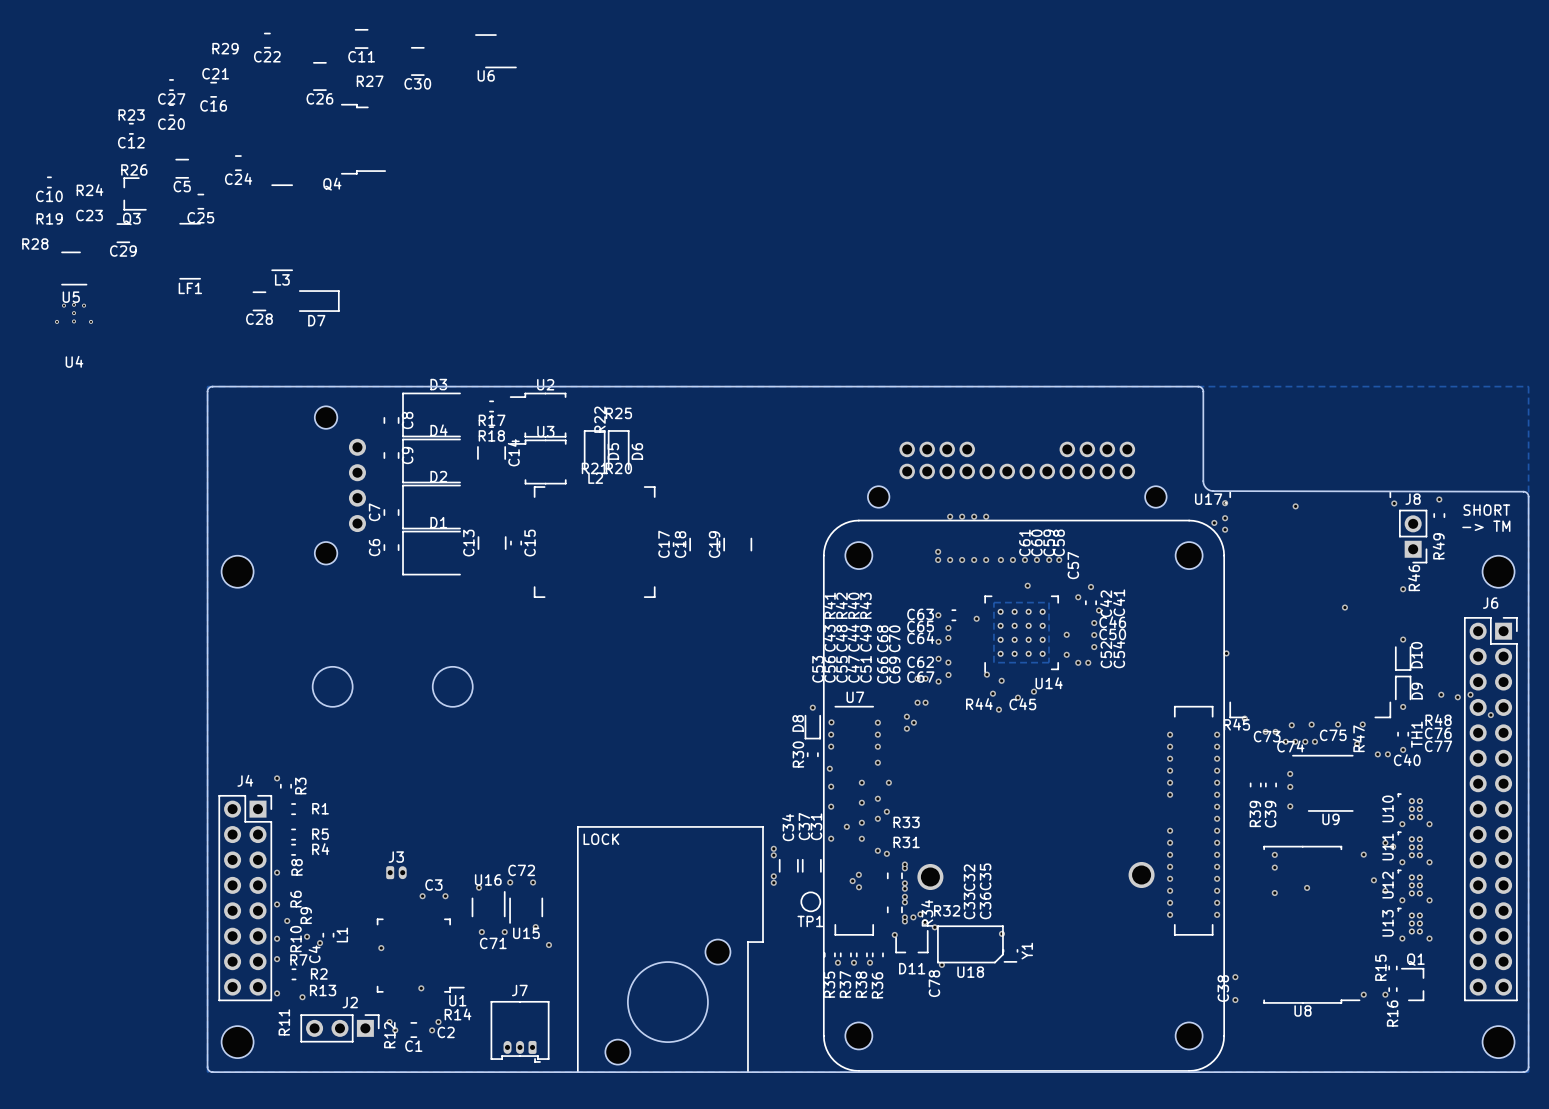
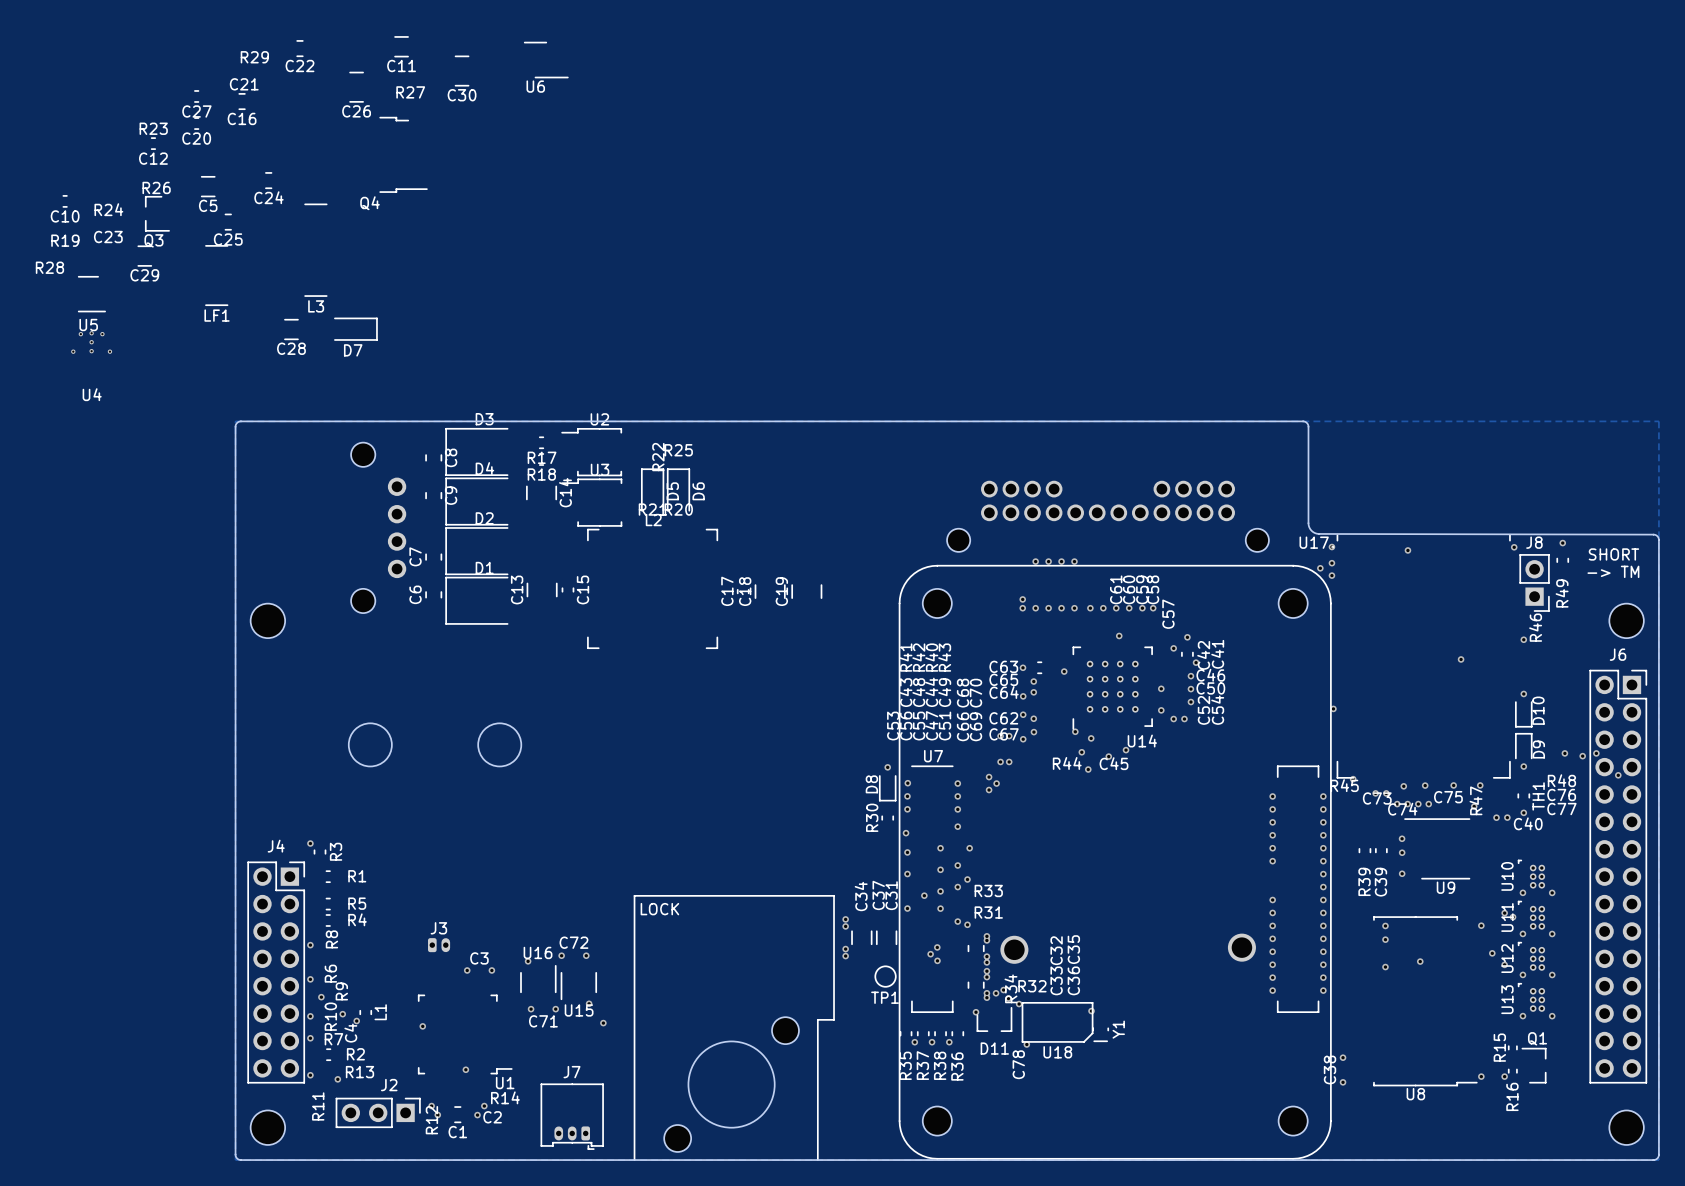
zone outline: (993, 602) (993, 662) (1049, 662) (1049, 602) (993, 602) -> none

